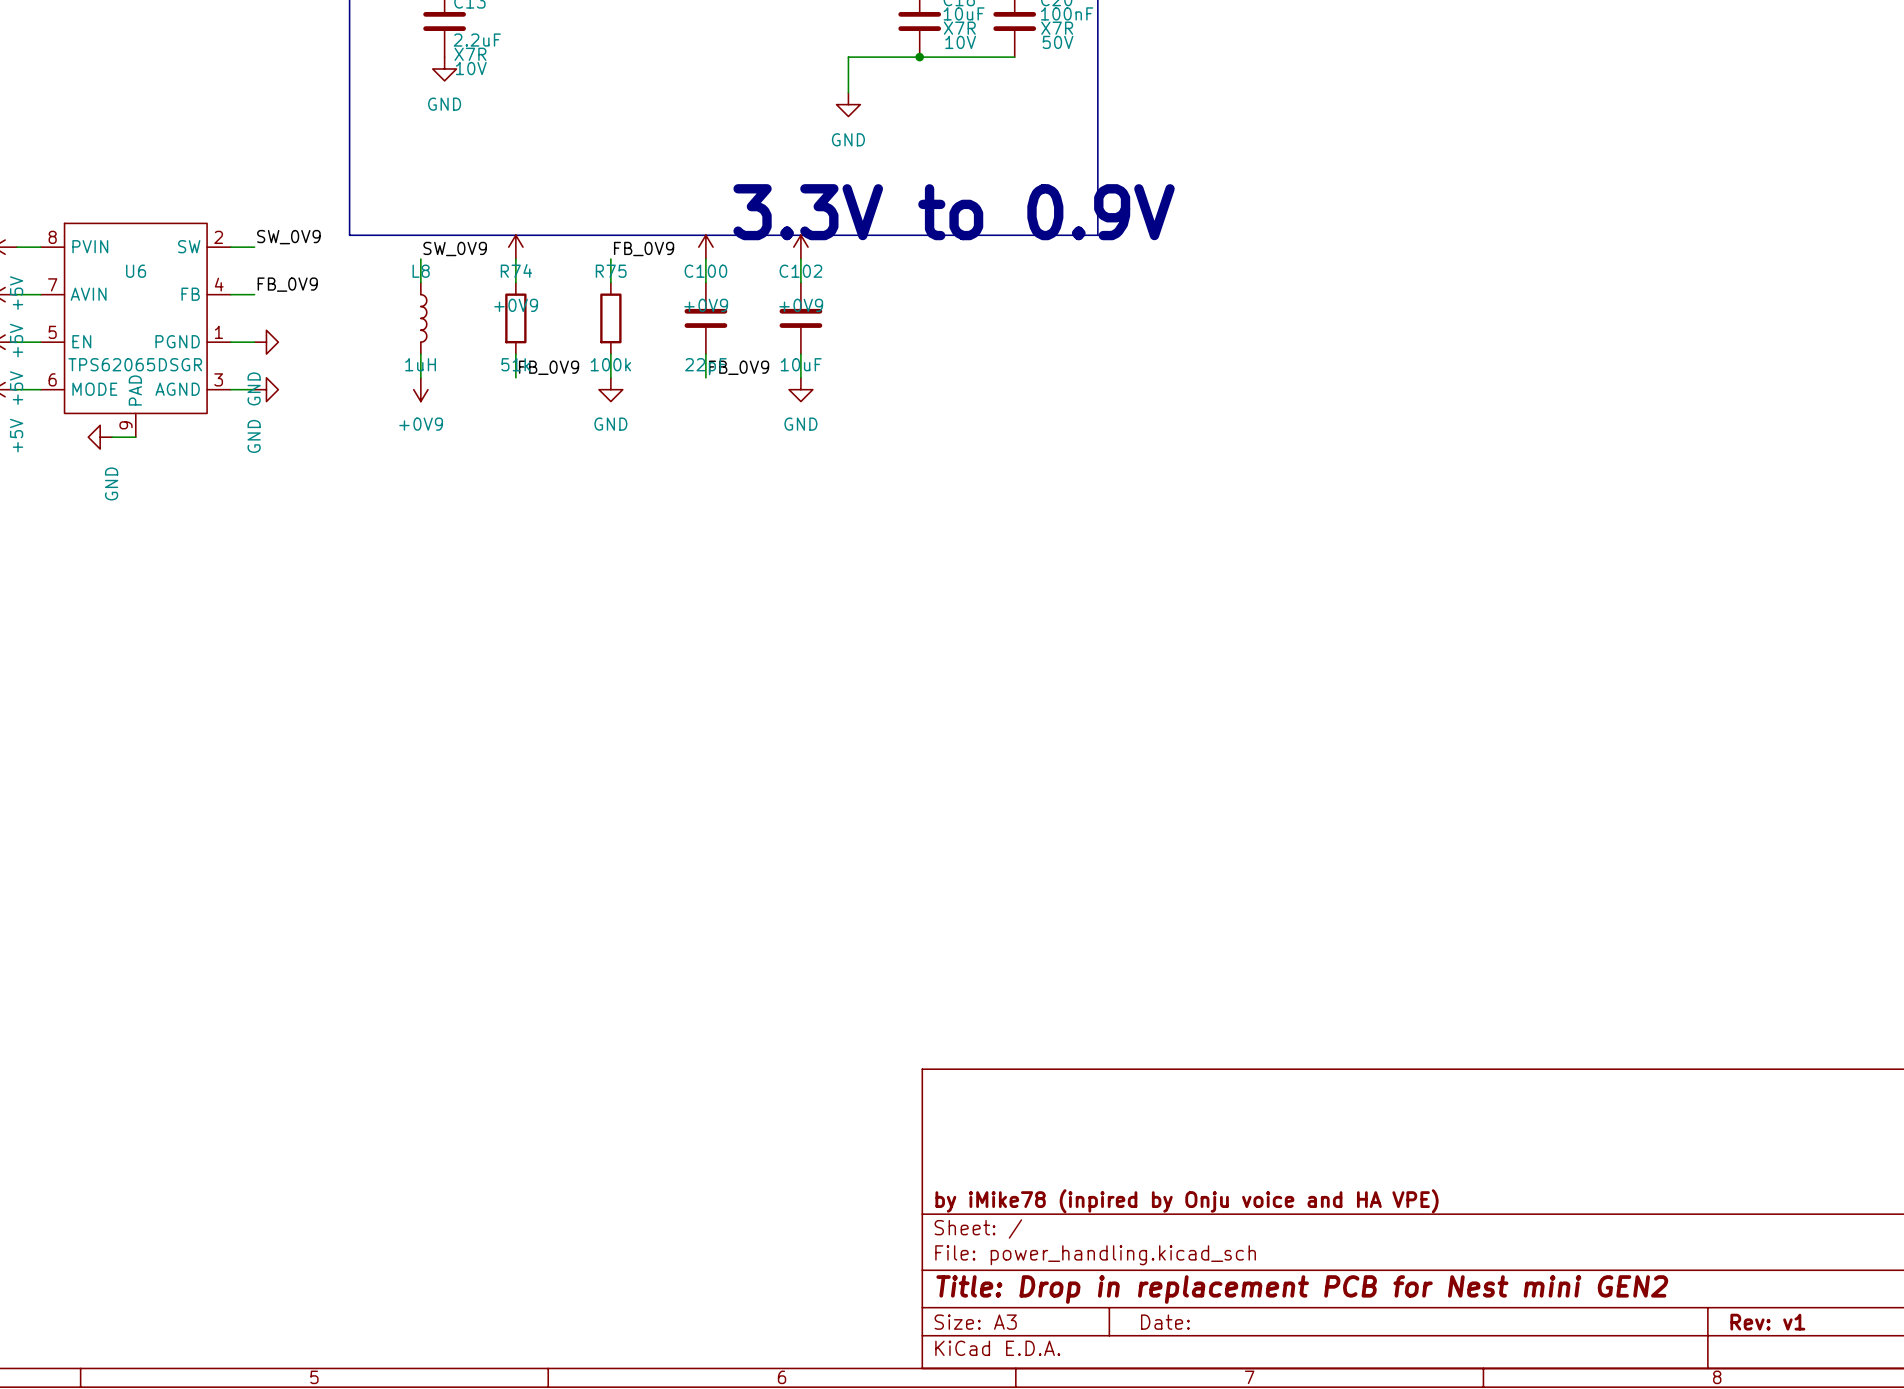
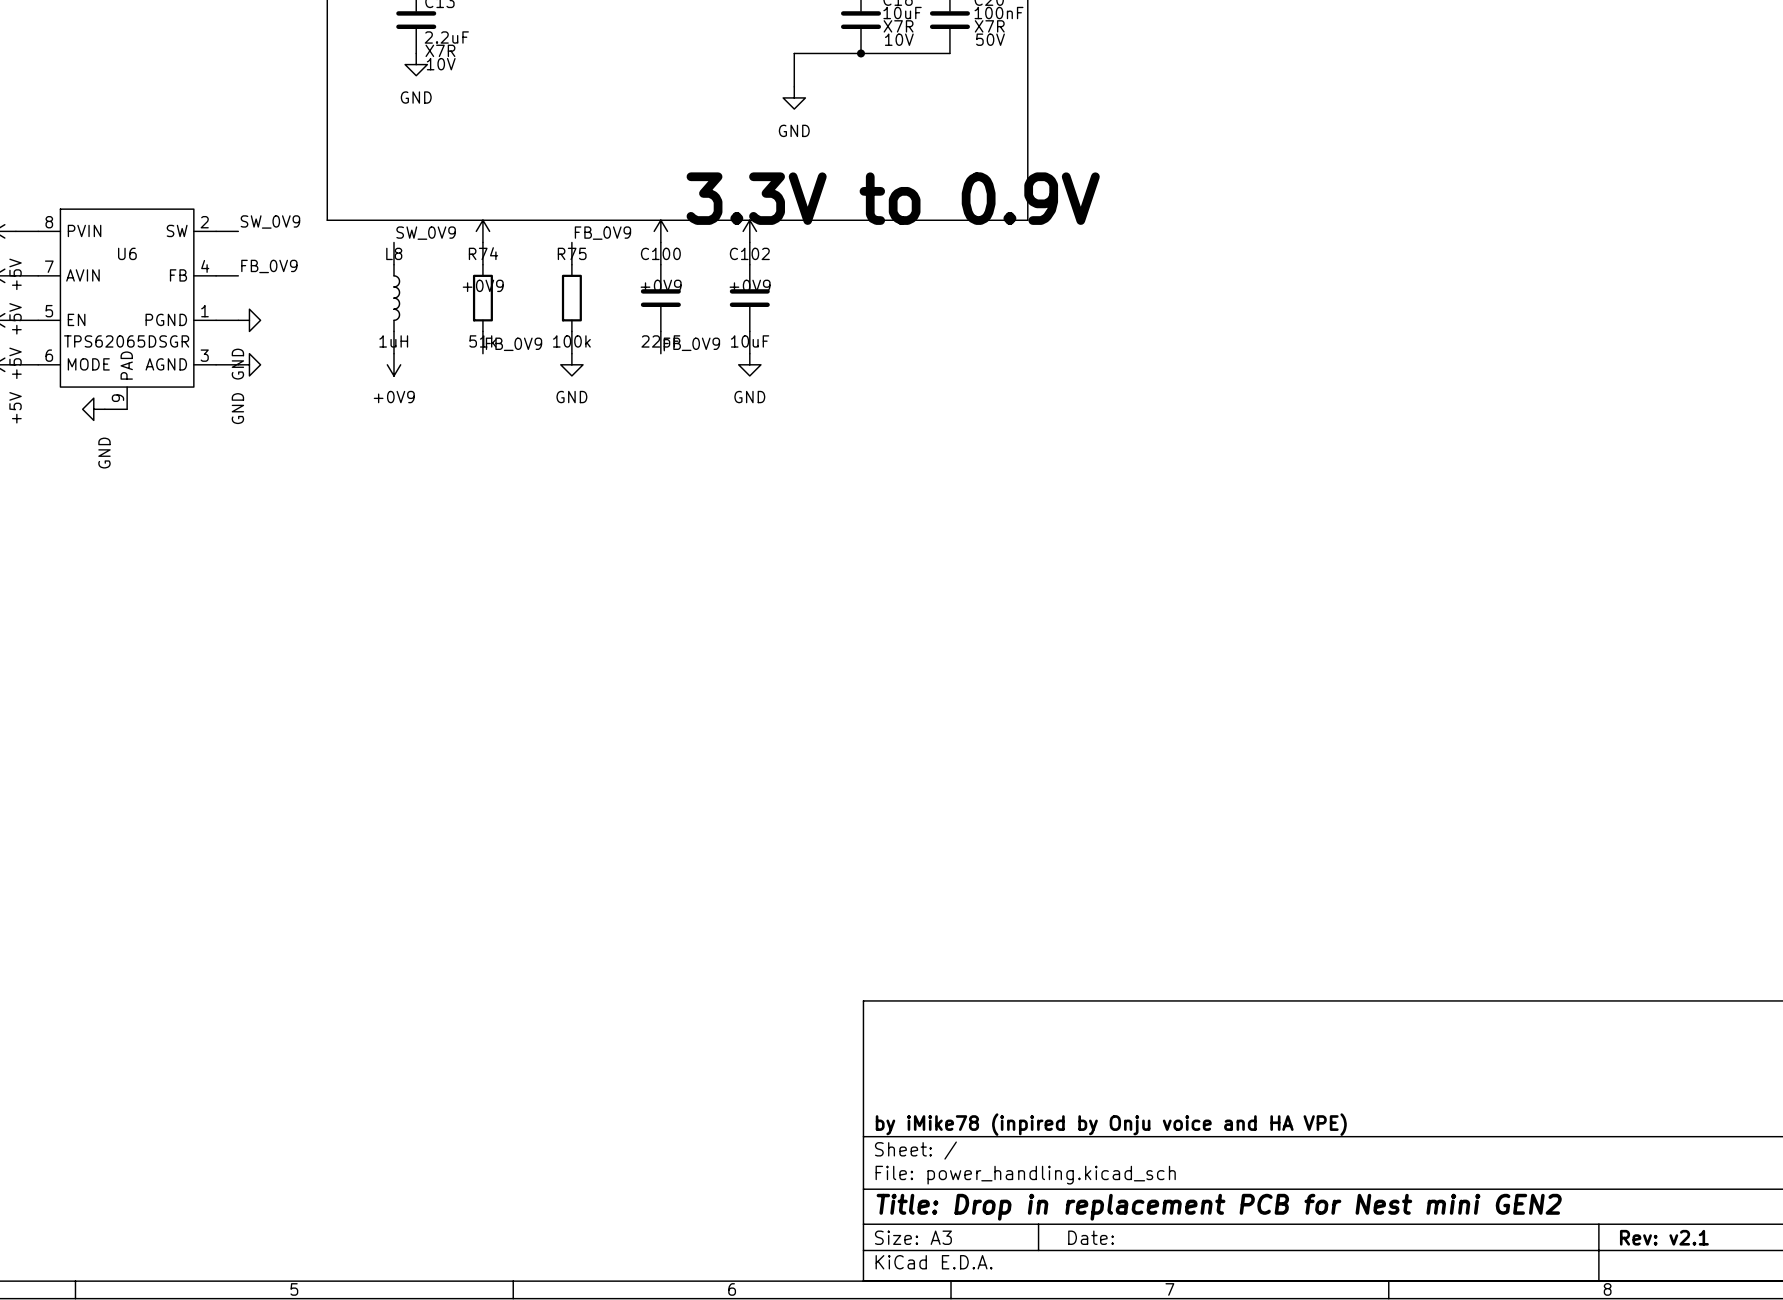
title block: Rev: v1 (1767, 1322) -> Rev: v2.1 (1664, 1237)

